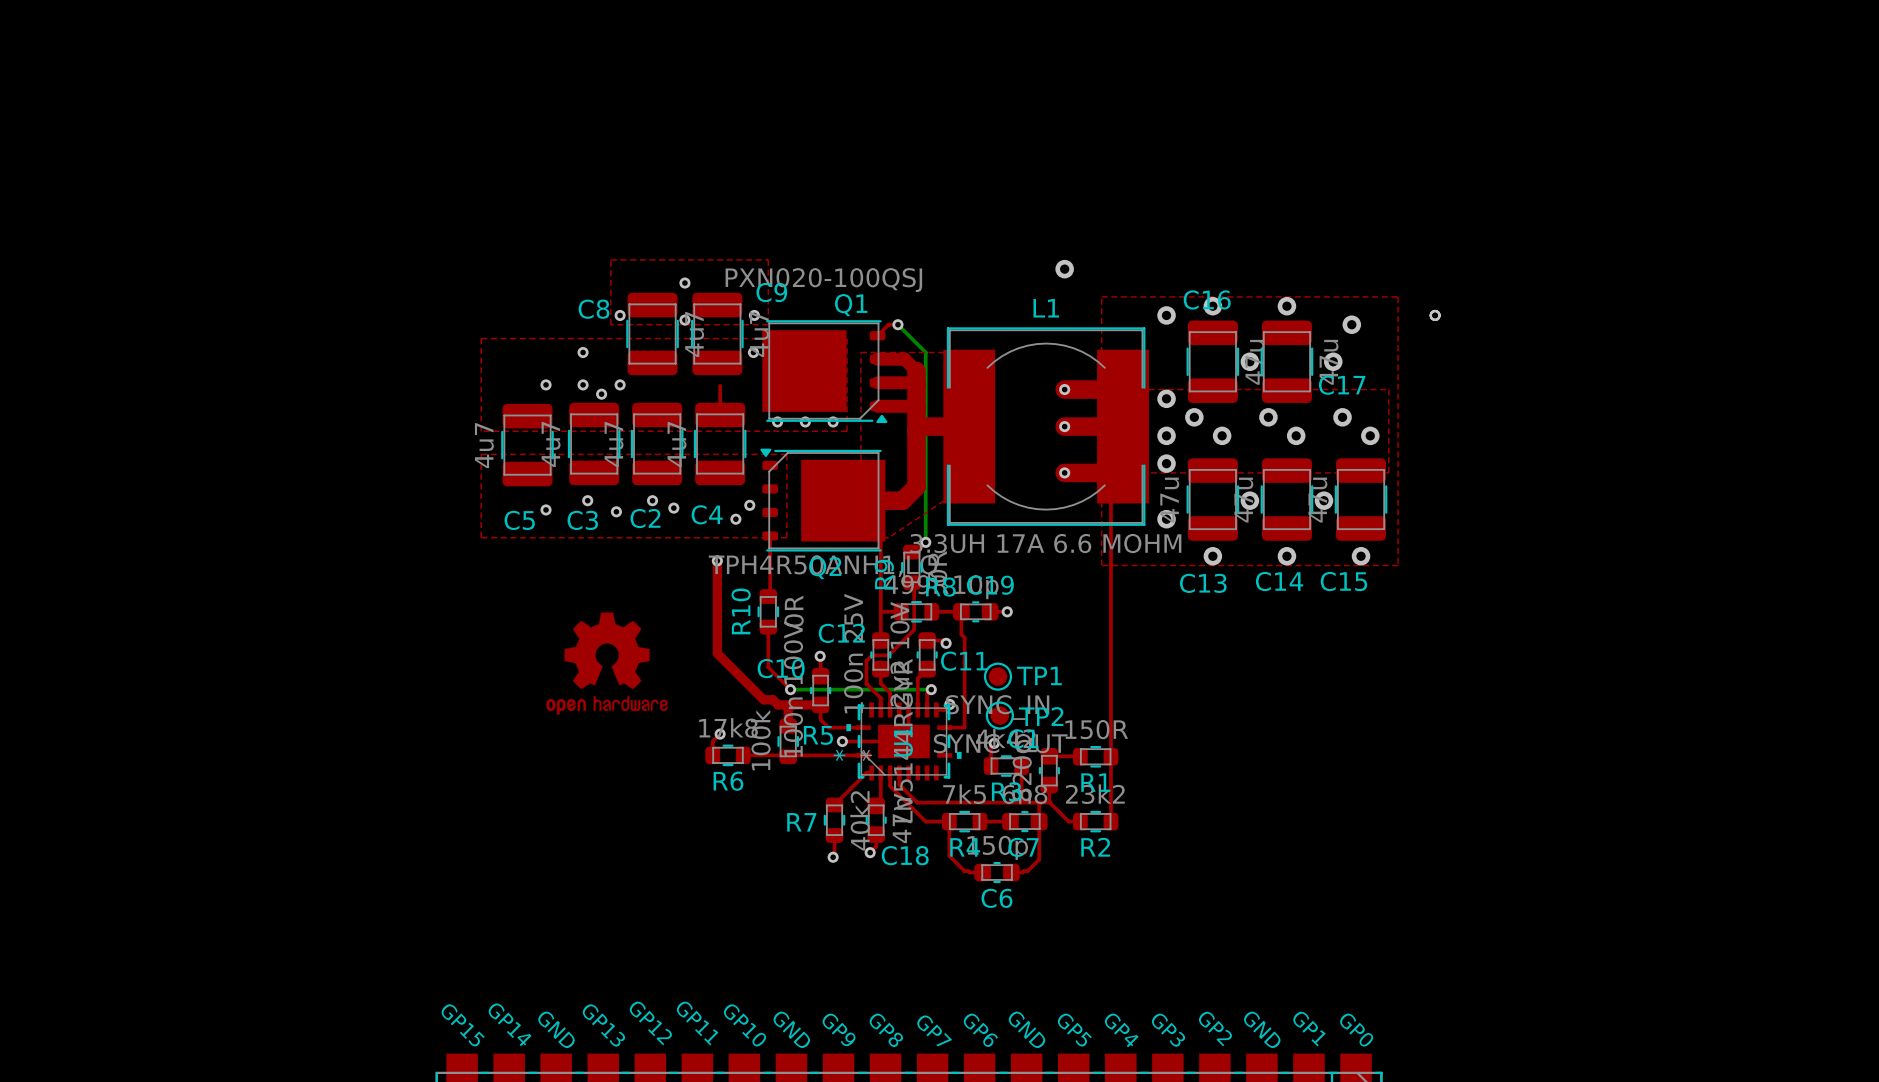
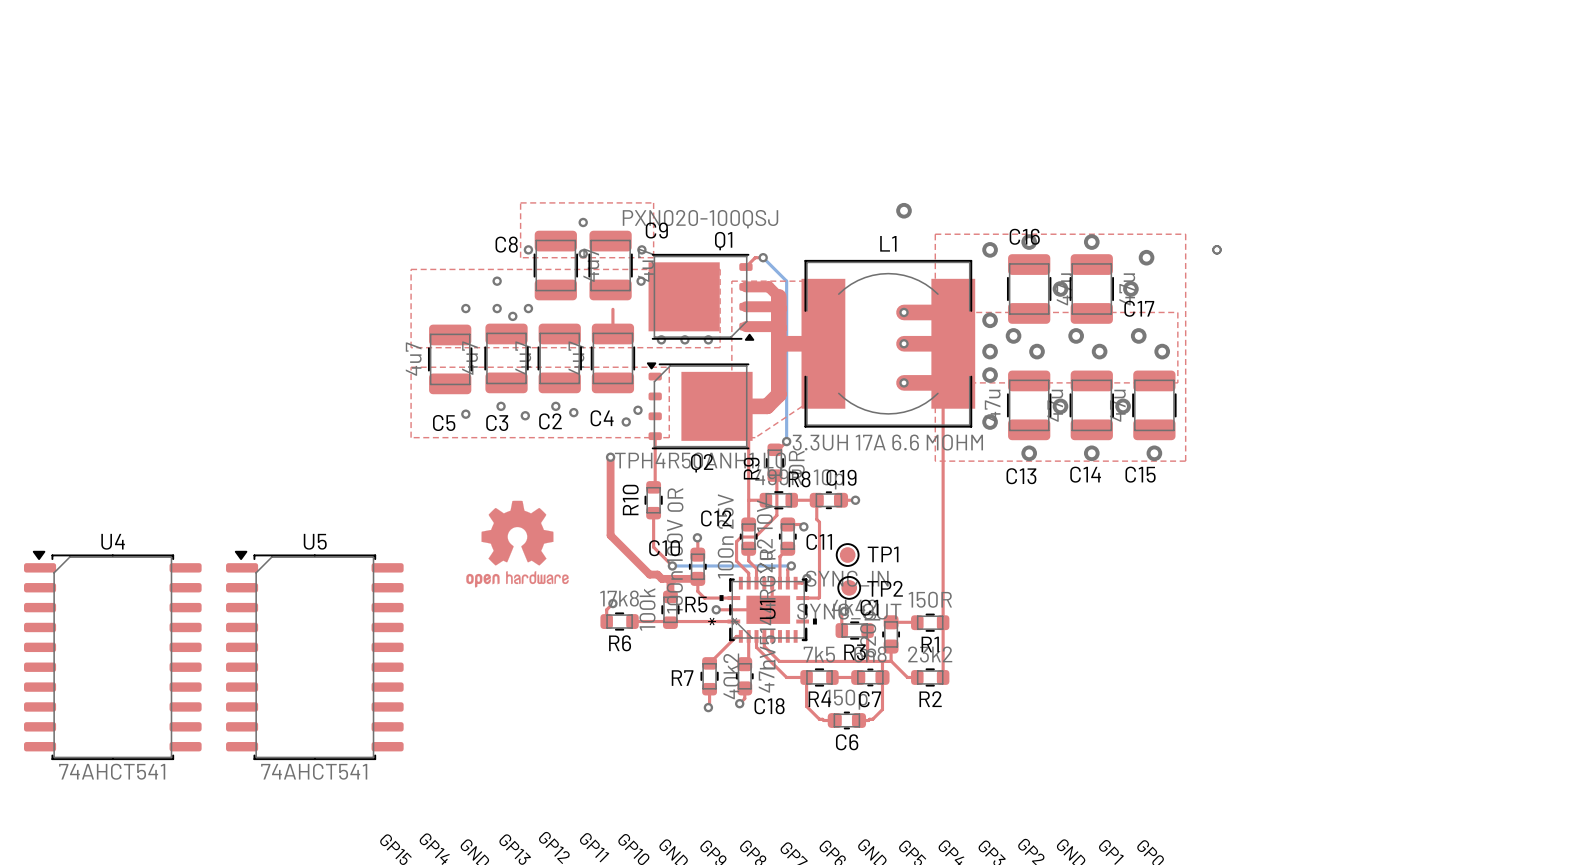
U4: none -> 74AHCT541 (112, 655)
U5: none -> 74AHCT541 (314, 655)

